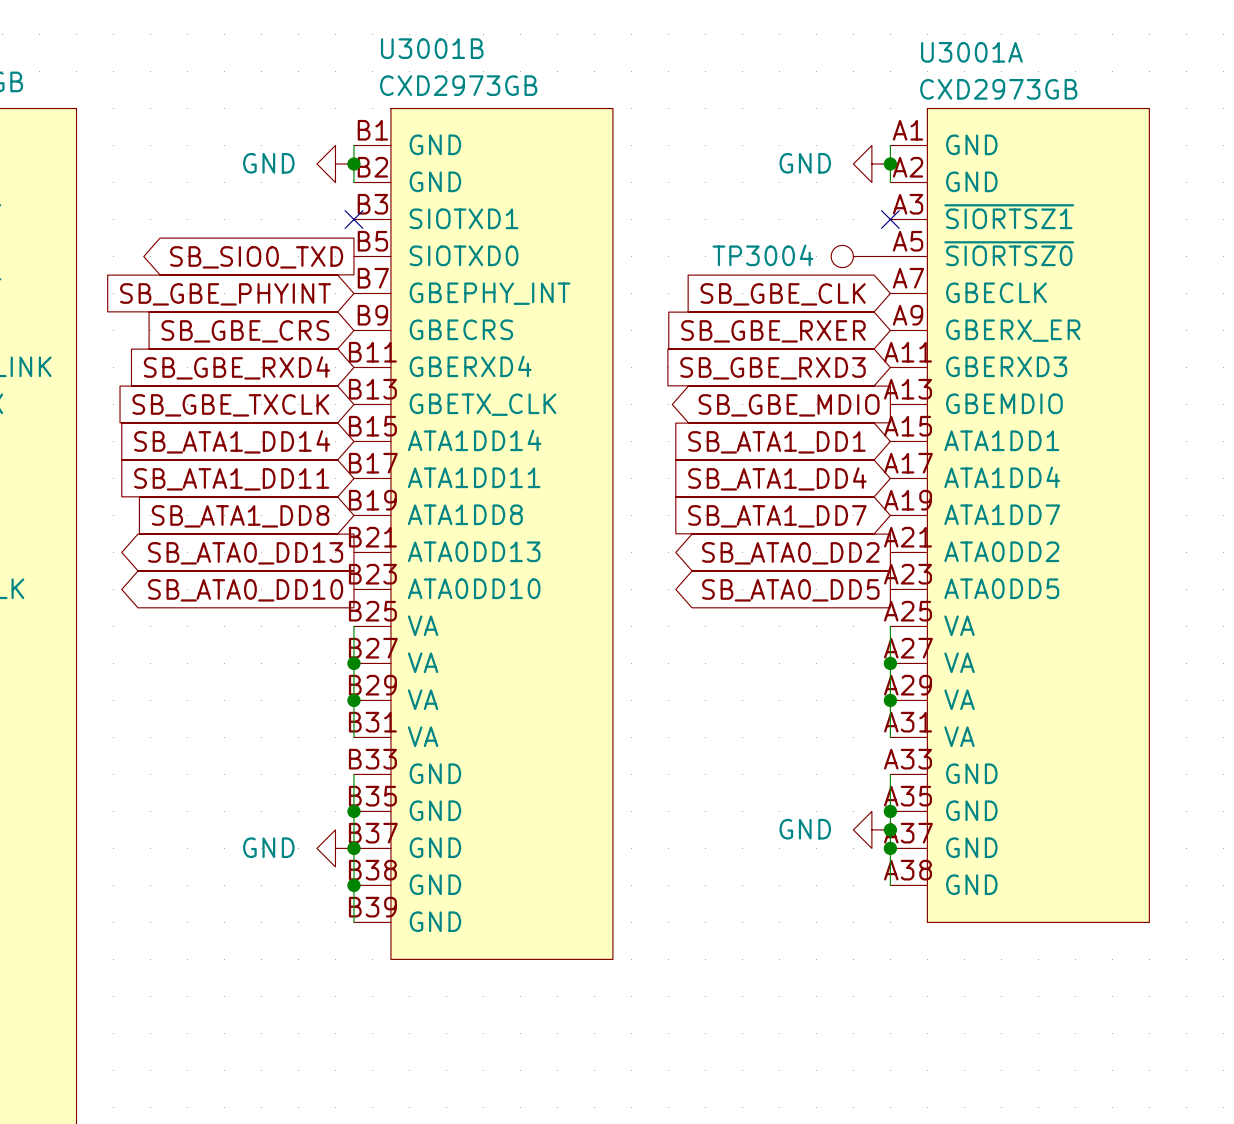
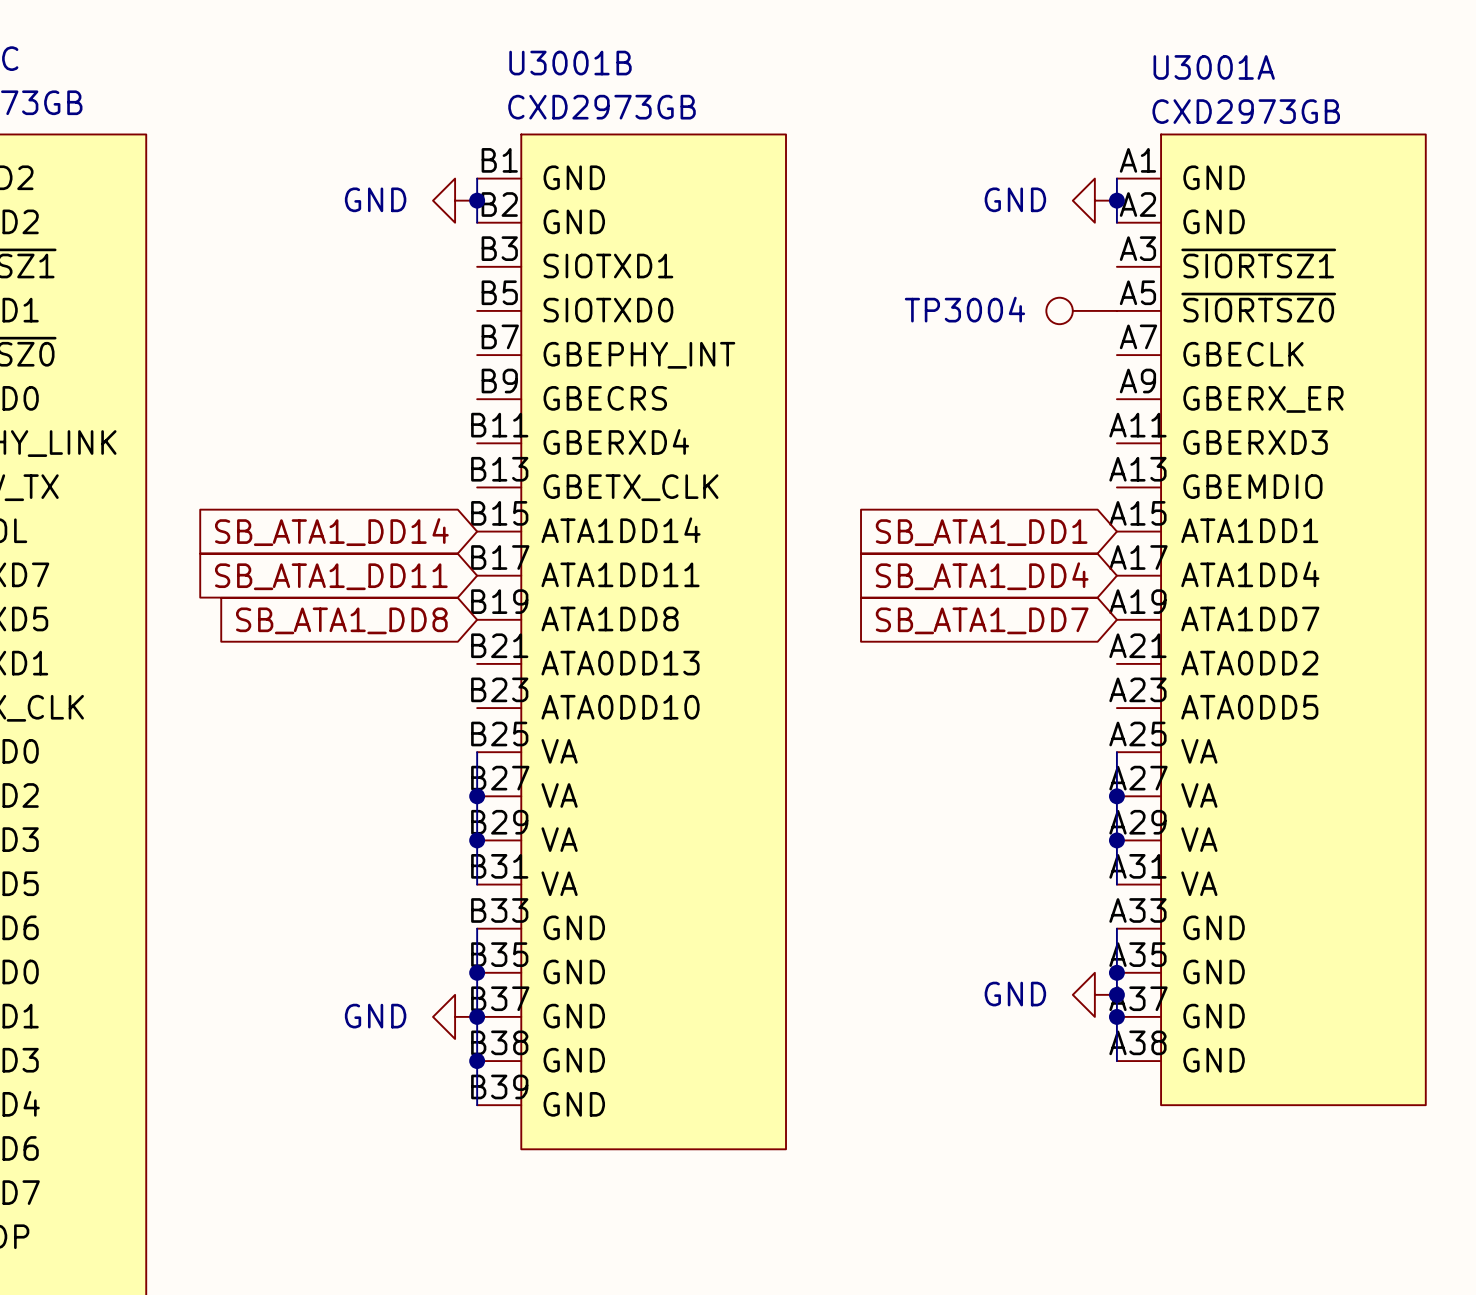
no-connect mark: (353, 219) -> none
no-connect mark: (890, 219) -> none
global label: SB_SIO0_TXD (256, 257) -> none
global label: SB_GBE_PHYINT (225, 294) -> none
global label: SB_GBE_CLK (783, 294) -> none
global label: SB_GBE_CRS (245, 331) -> none
global label: SB_GBE_RXER (773, 331) -> none
global label: SB_GBE_RXD4 (237, 367) -> none
global label: SB_GBE_RXD3 (772, 368) -> none
global label: SB_GBE_TXCLK (230, 405) -> none
global label: SB_GBE_MDIO (789, 405) -> none
global label: SB_ATA0_DD13 (245, 553) -> none
global label: SB_ATA0_DD2 (790, 553) -> none
global label: SB_ATA0_DD10 (245, 590) -> none
global label: SB_ATA0_DD5 (790, 590) -> none

